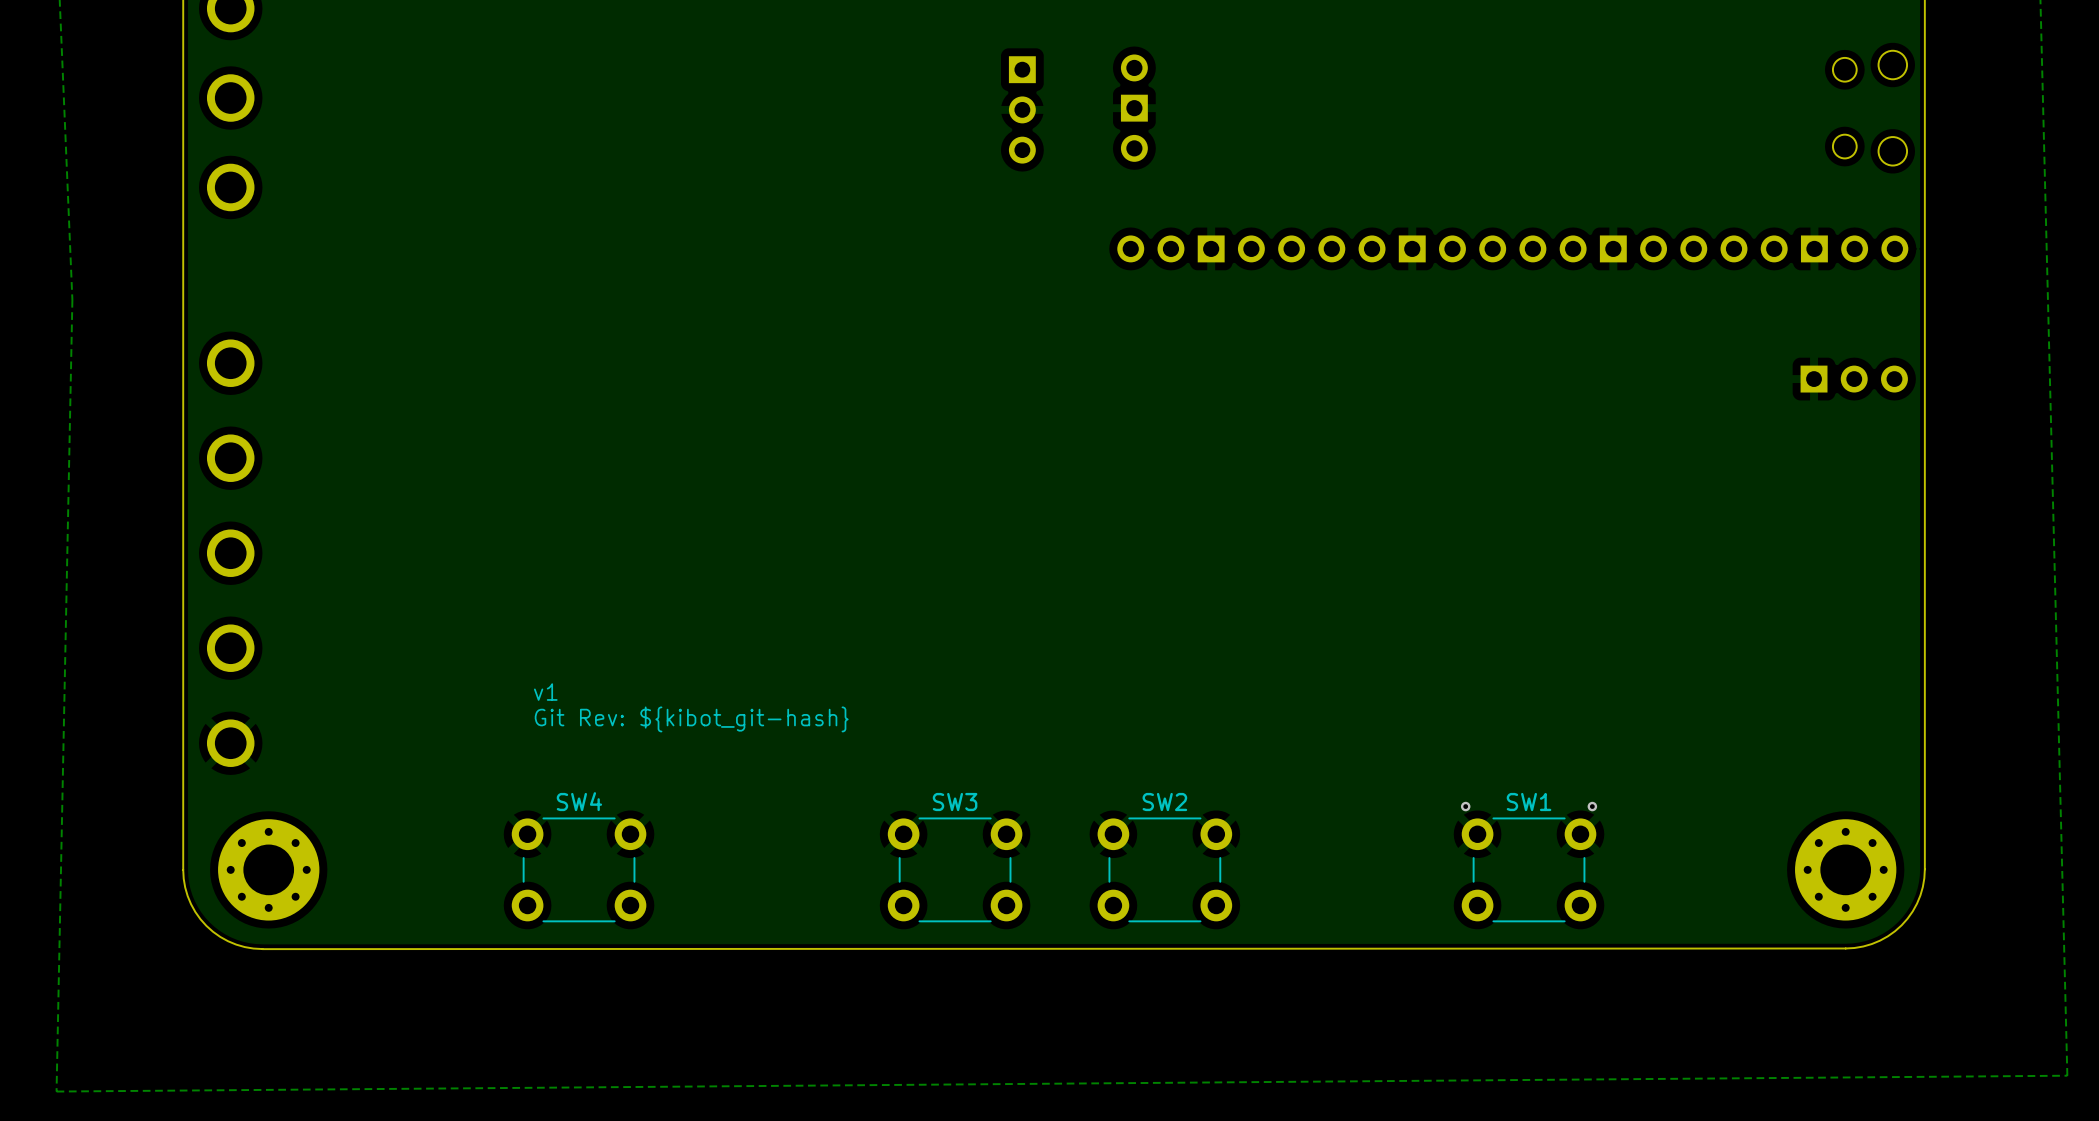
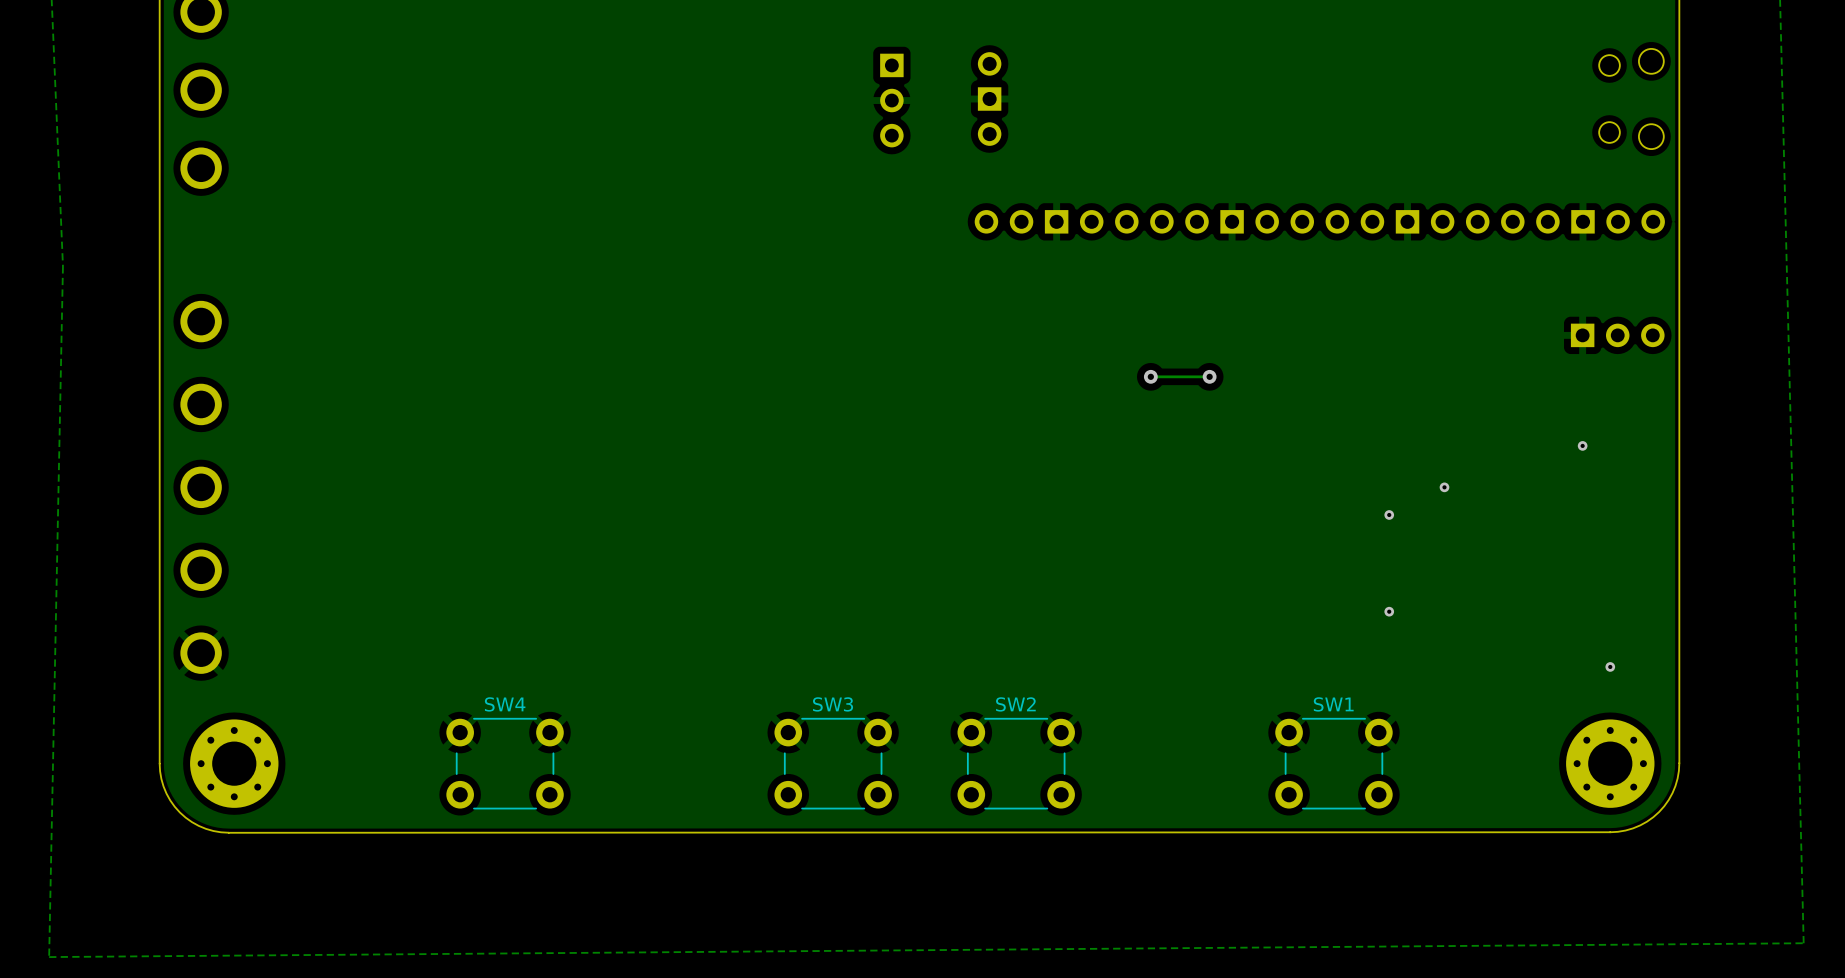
via: none -> (1150, 376)
track: none -> (1209, 376) (1150, 376)
via: none -> (1209, 376)
via: none -> (1582, 445)
via: none -> (1444, 487)
via: none -> (1389, 514)
text: v1 (545, 692) -> none
via: none -> (1389, 611)
text: Git Rev: ${kibot_git-hash} (691, 719) -> none
via: none -> (1610, 666)
via: (1465, 806) -> none
via: (1592, 806) -> none

